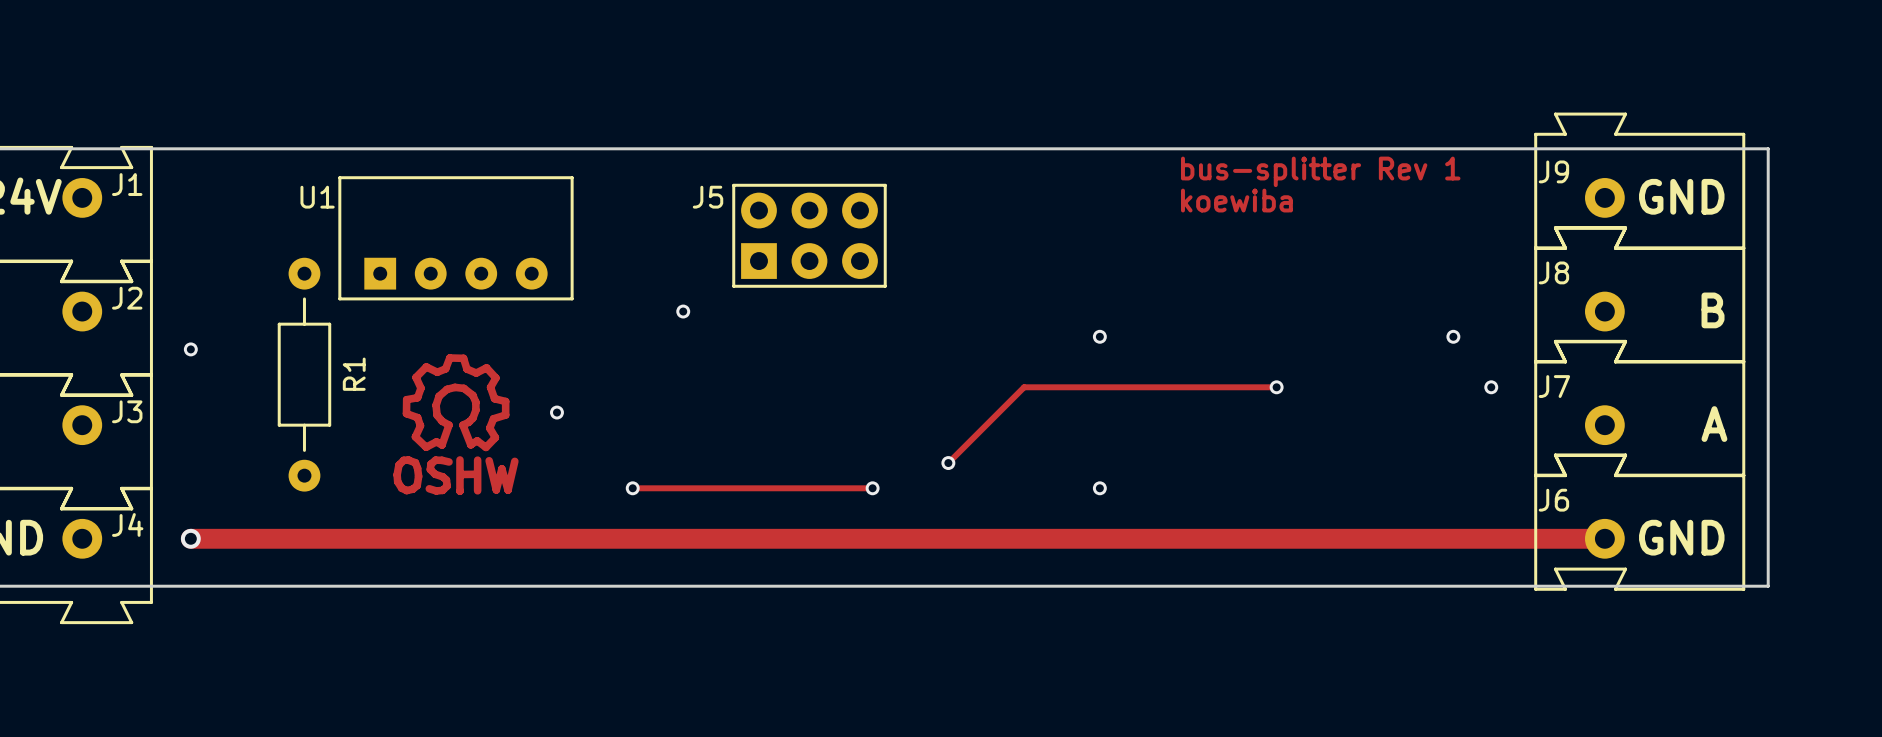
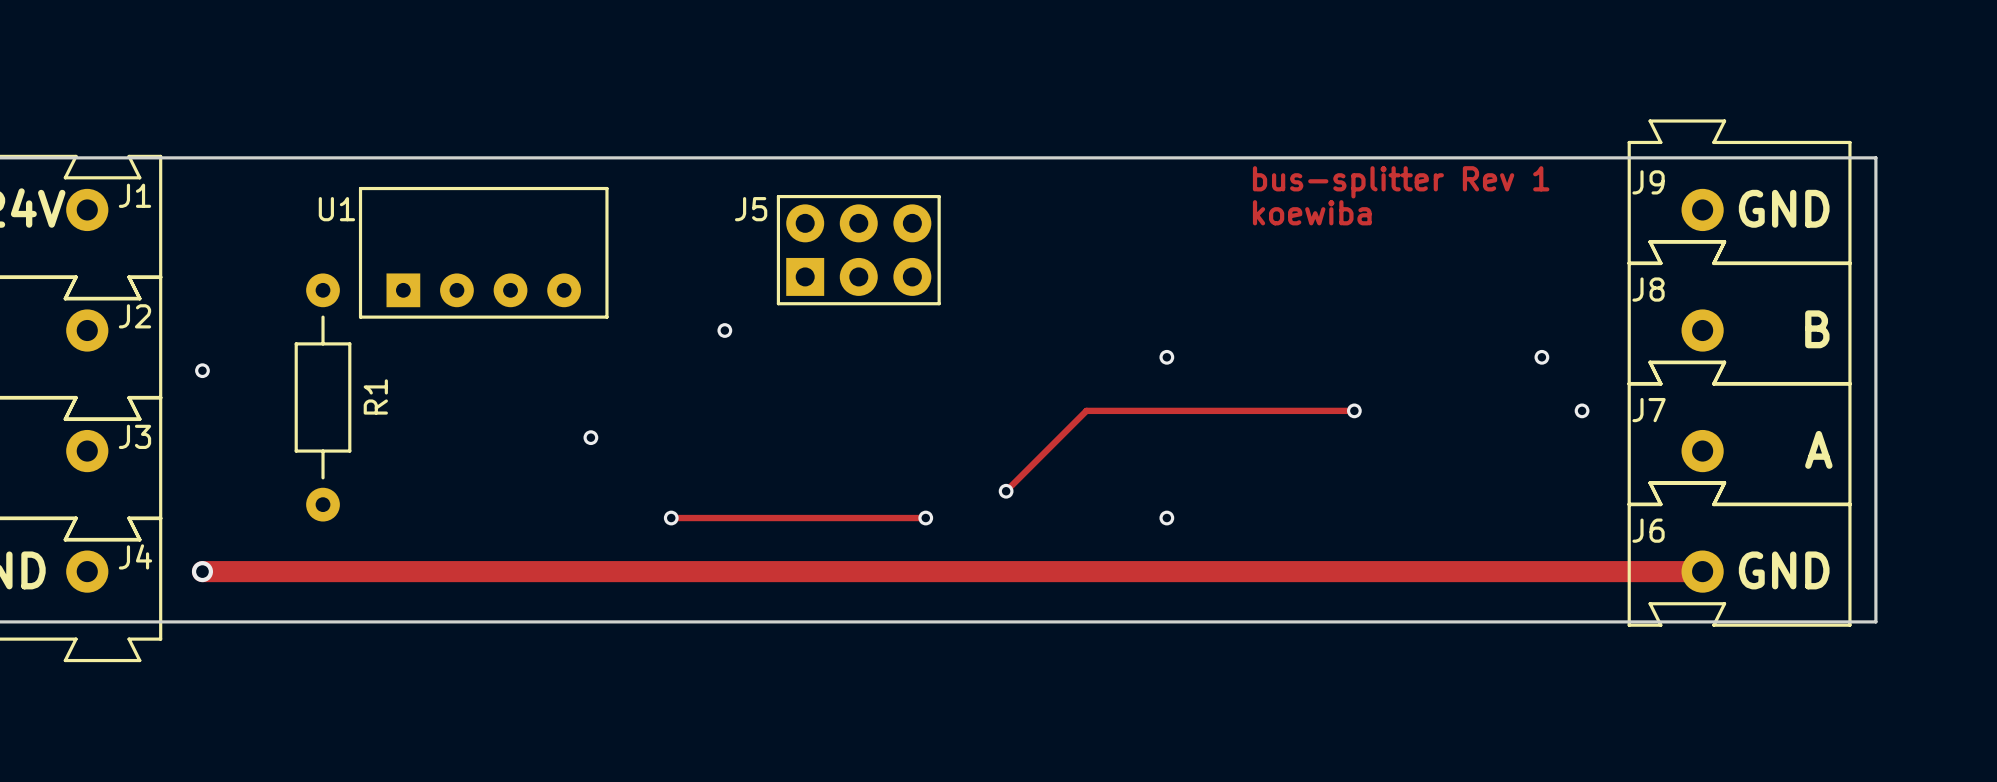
drawing: [393, 354, 519, 495] -> none

